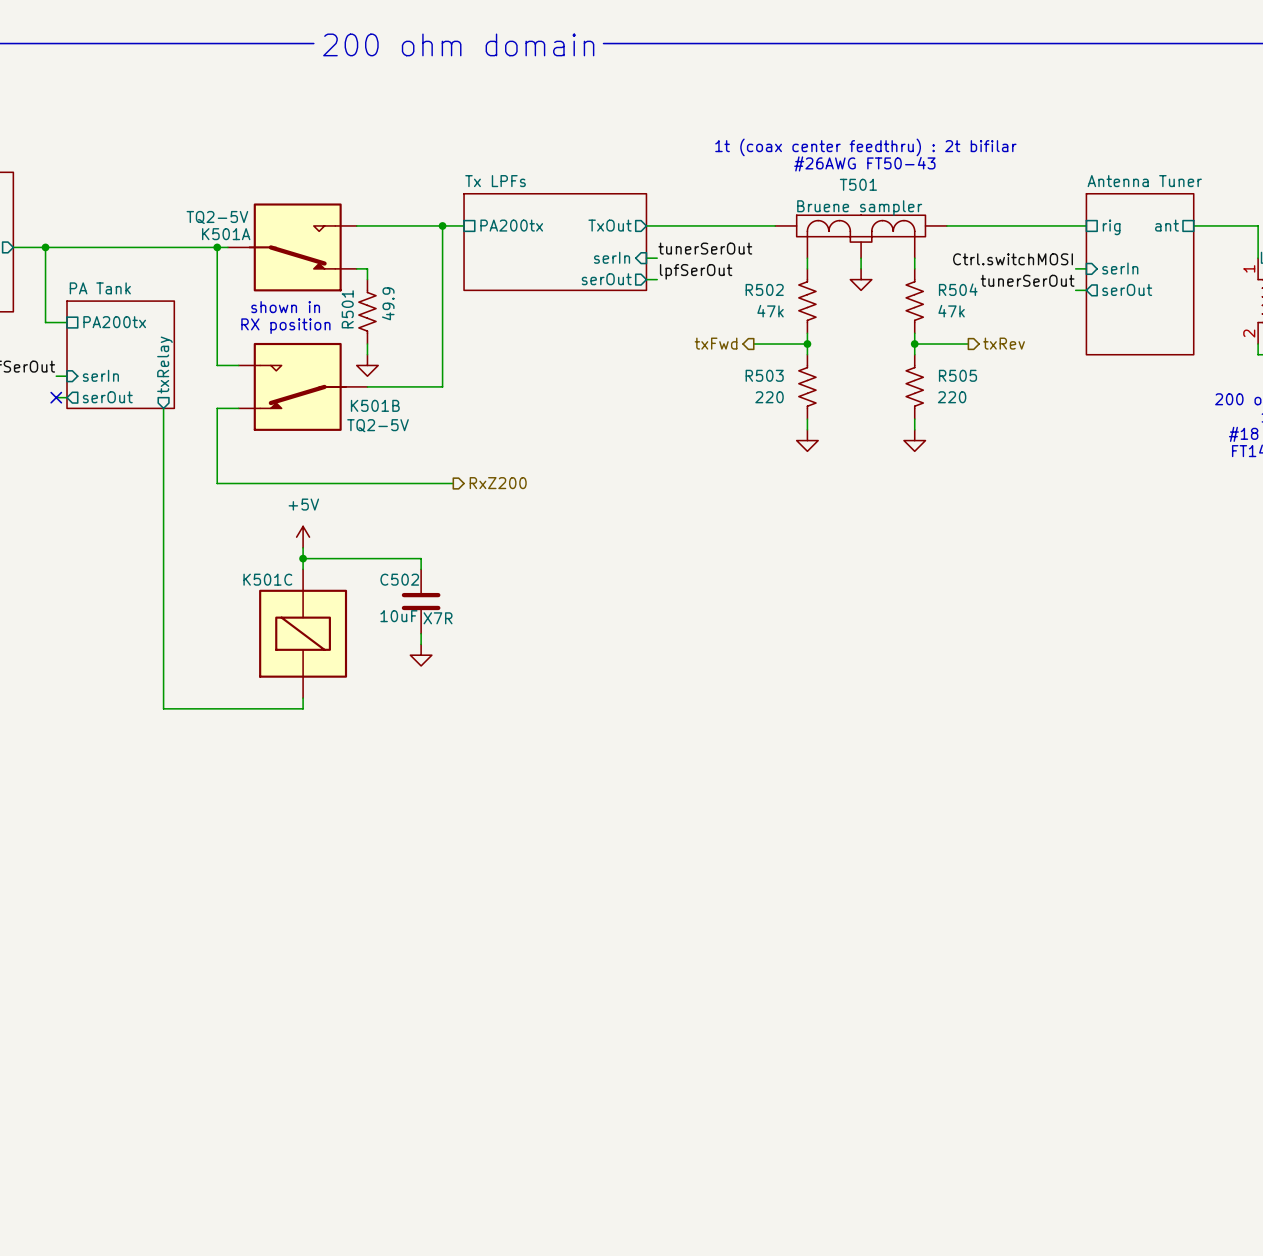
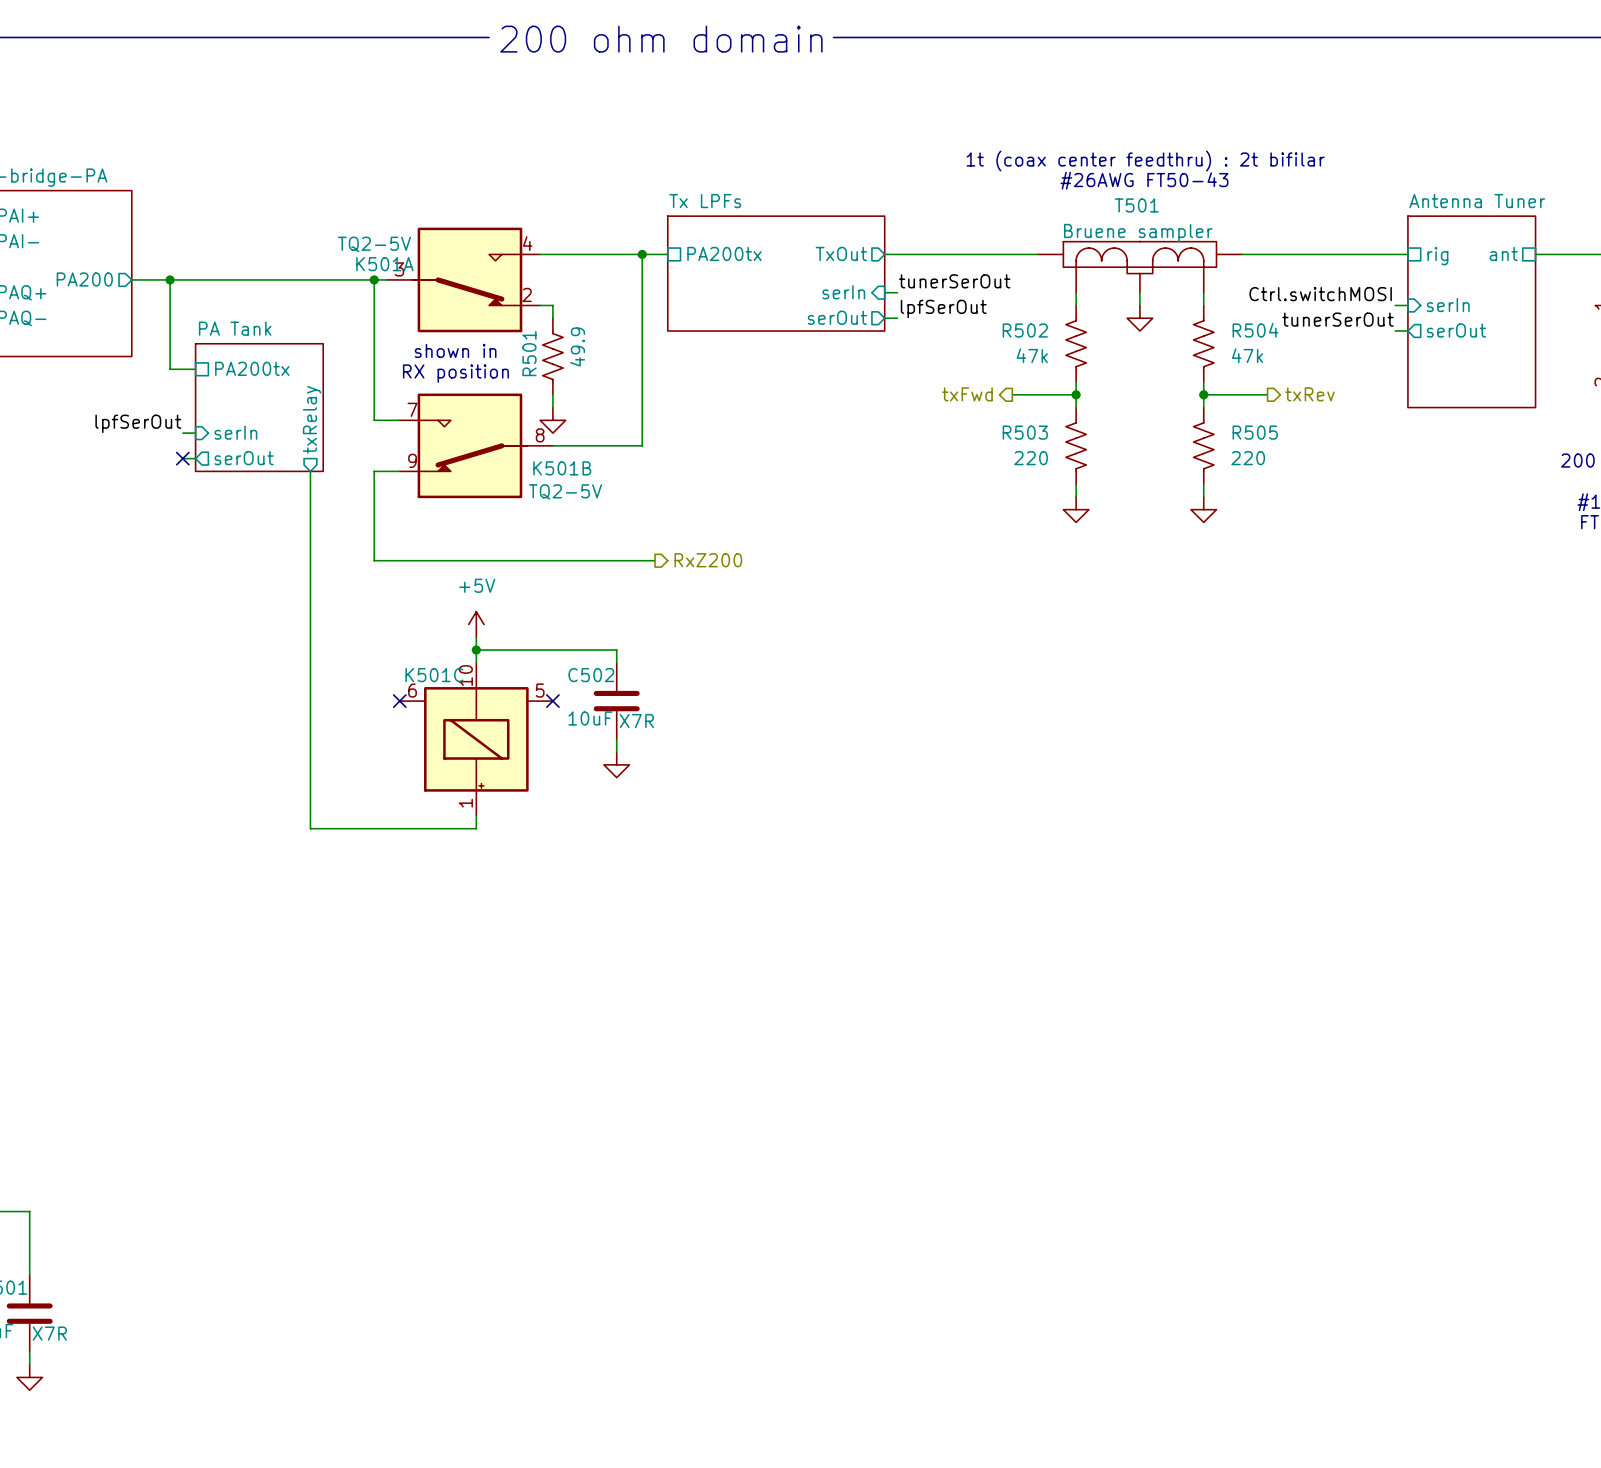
K501A pin number: none -> 4 (527, 243)
K501A pin number: none -> 3 (399, 269)
K501A pin number: none -> 2 (527, 294)
K501B pin number: none -> 7 (412, 409)
K501B pin number: none -> 8 (540, 435)
K501B pin number: none -> 9 (412, 460)
K501C symbol: [259, 569, 348, 699] -> [399, 662, 553, 816]
no-connect mark: none -> (399, 701)
no-connect mark: none -> (552, 701)

